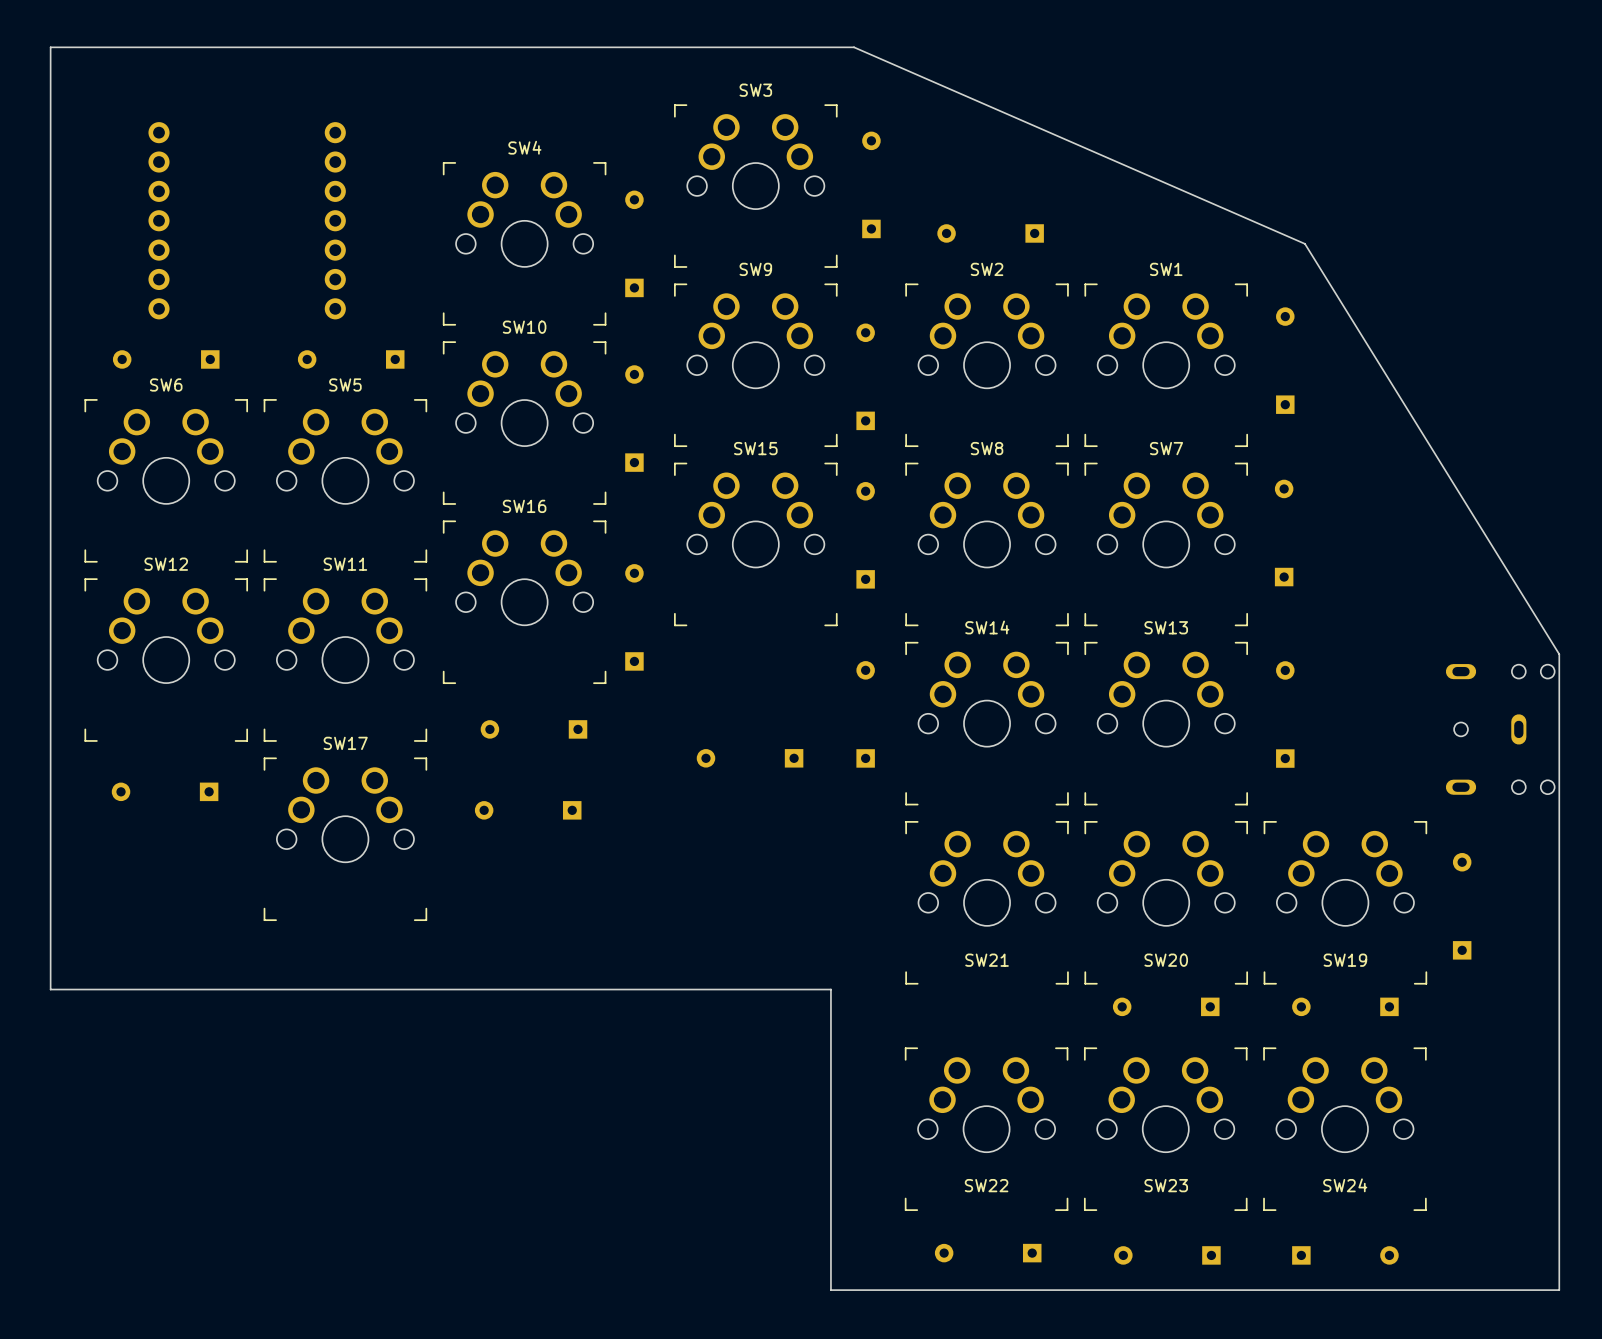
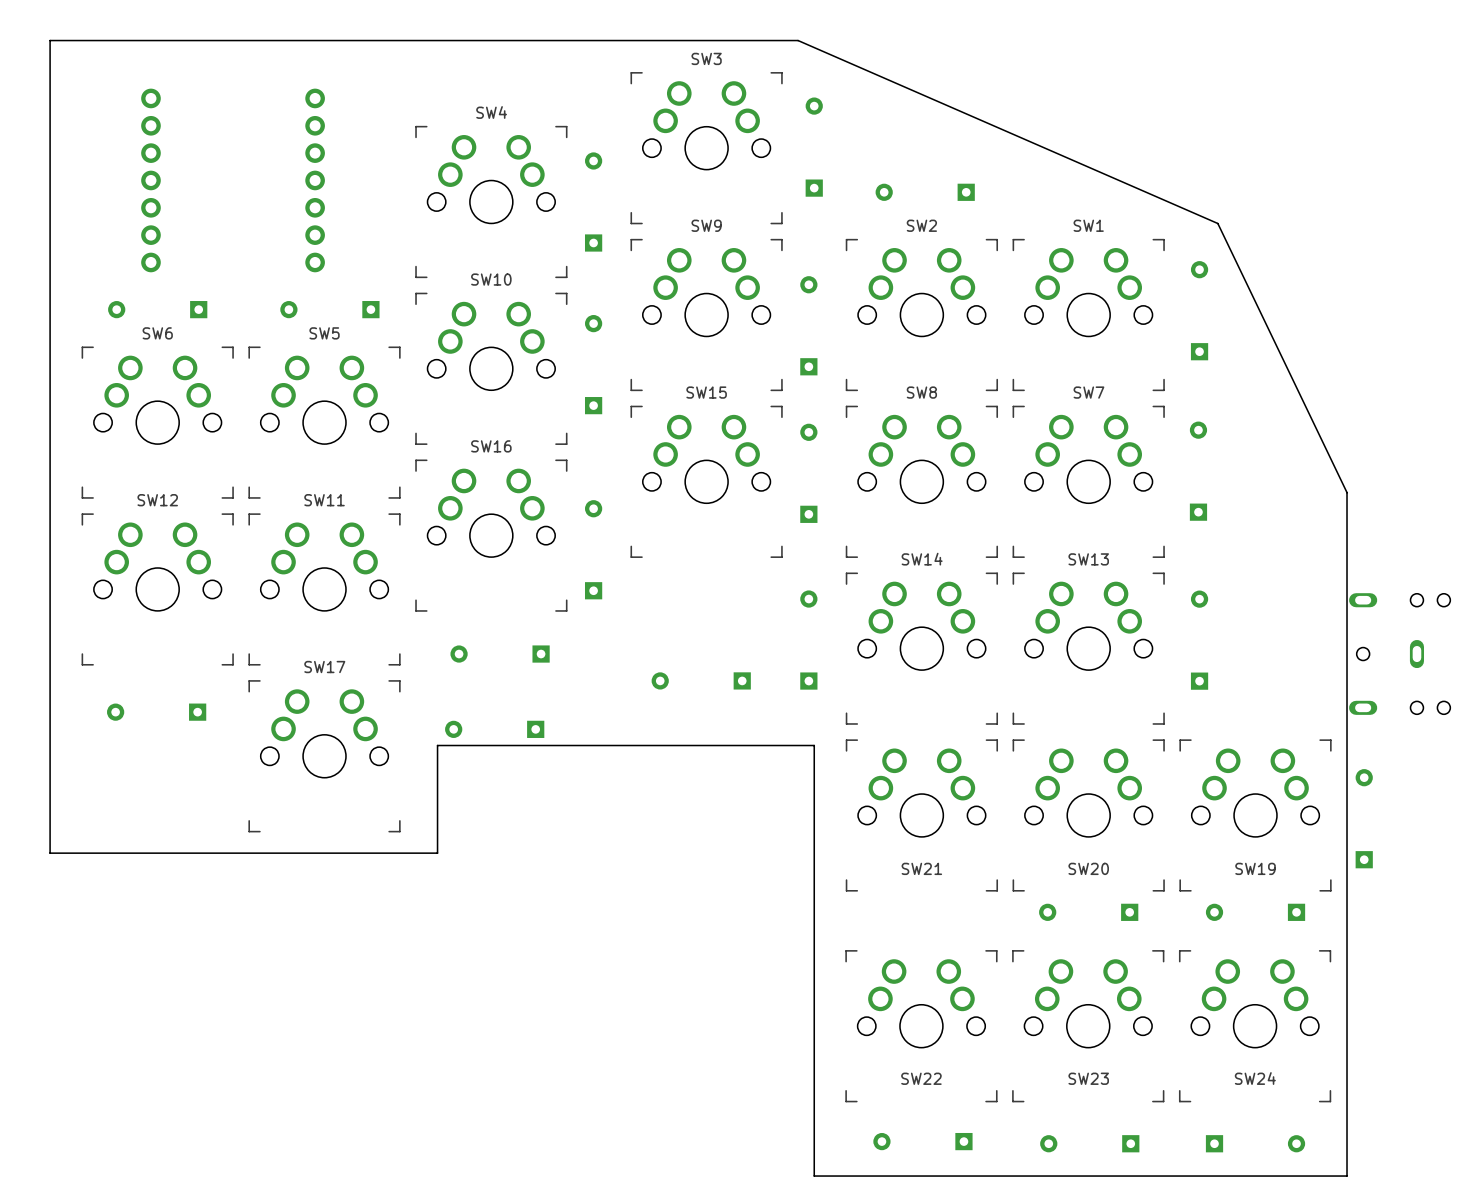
board edge: (50, 70) (50, 47) (854, 47) (1304, 243) (1559, 654) (1559, 1290) (1443, 1290) -> (50, 40) (798, 40) (1217, 223) (1347, 492) (1347, 1176)
board edge: (50, 943) (50, 989) (830, 989) (830, 1290) (871, 1290) -> (50, 853) (437, 853) (437, 745) (814, 745) (814, 1176)

